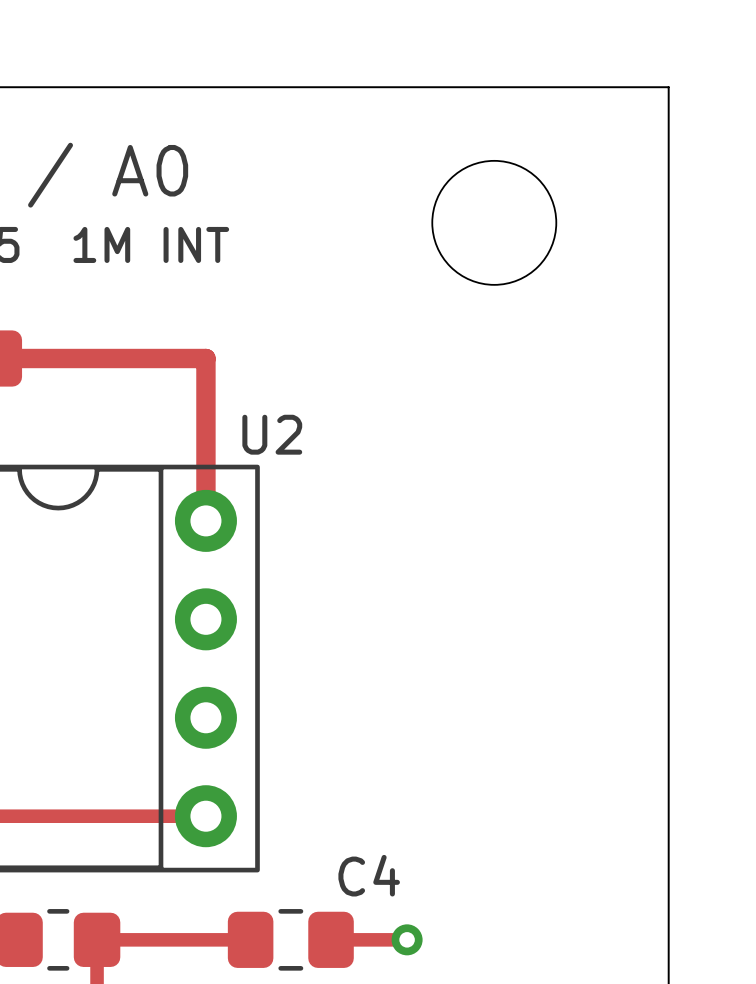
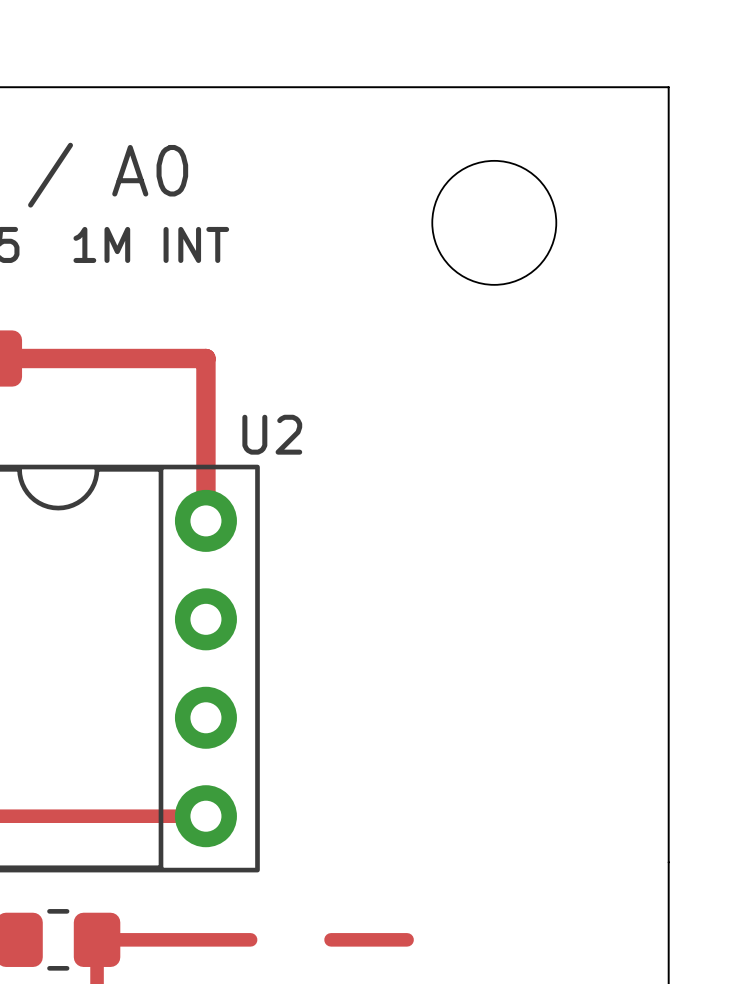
C4: (290, 939) -> none
via: (407, 939) -> none

